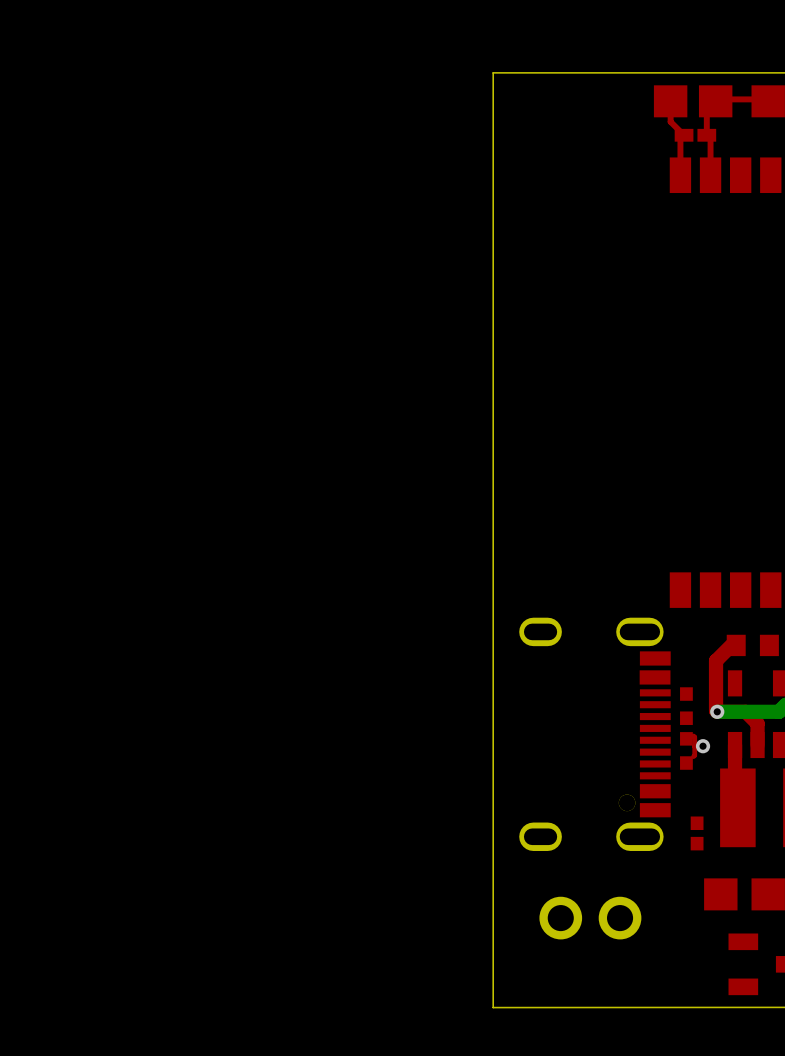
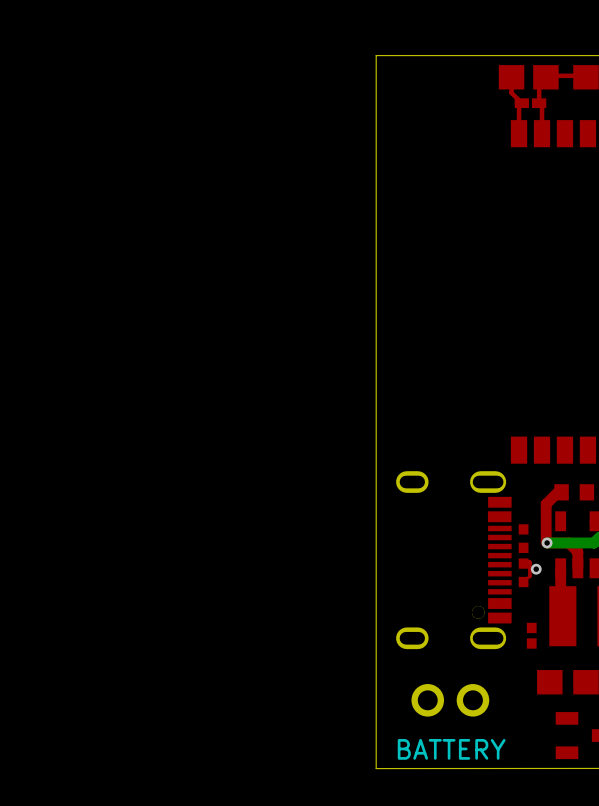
BATTERY name: none -> BATTERY (451, 749)

